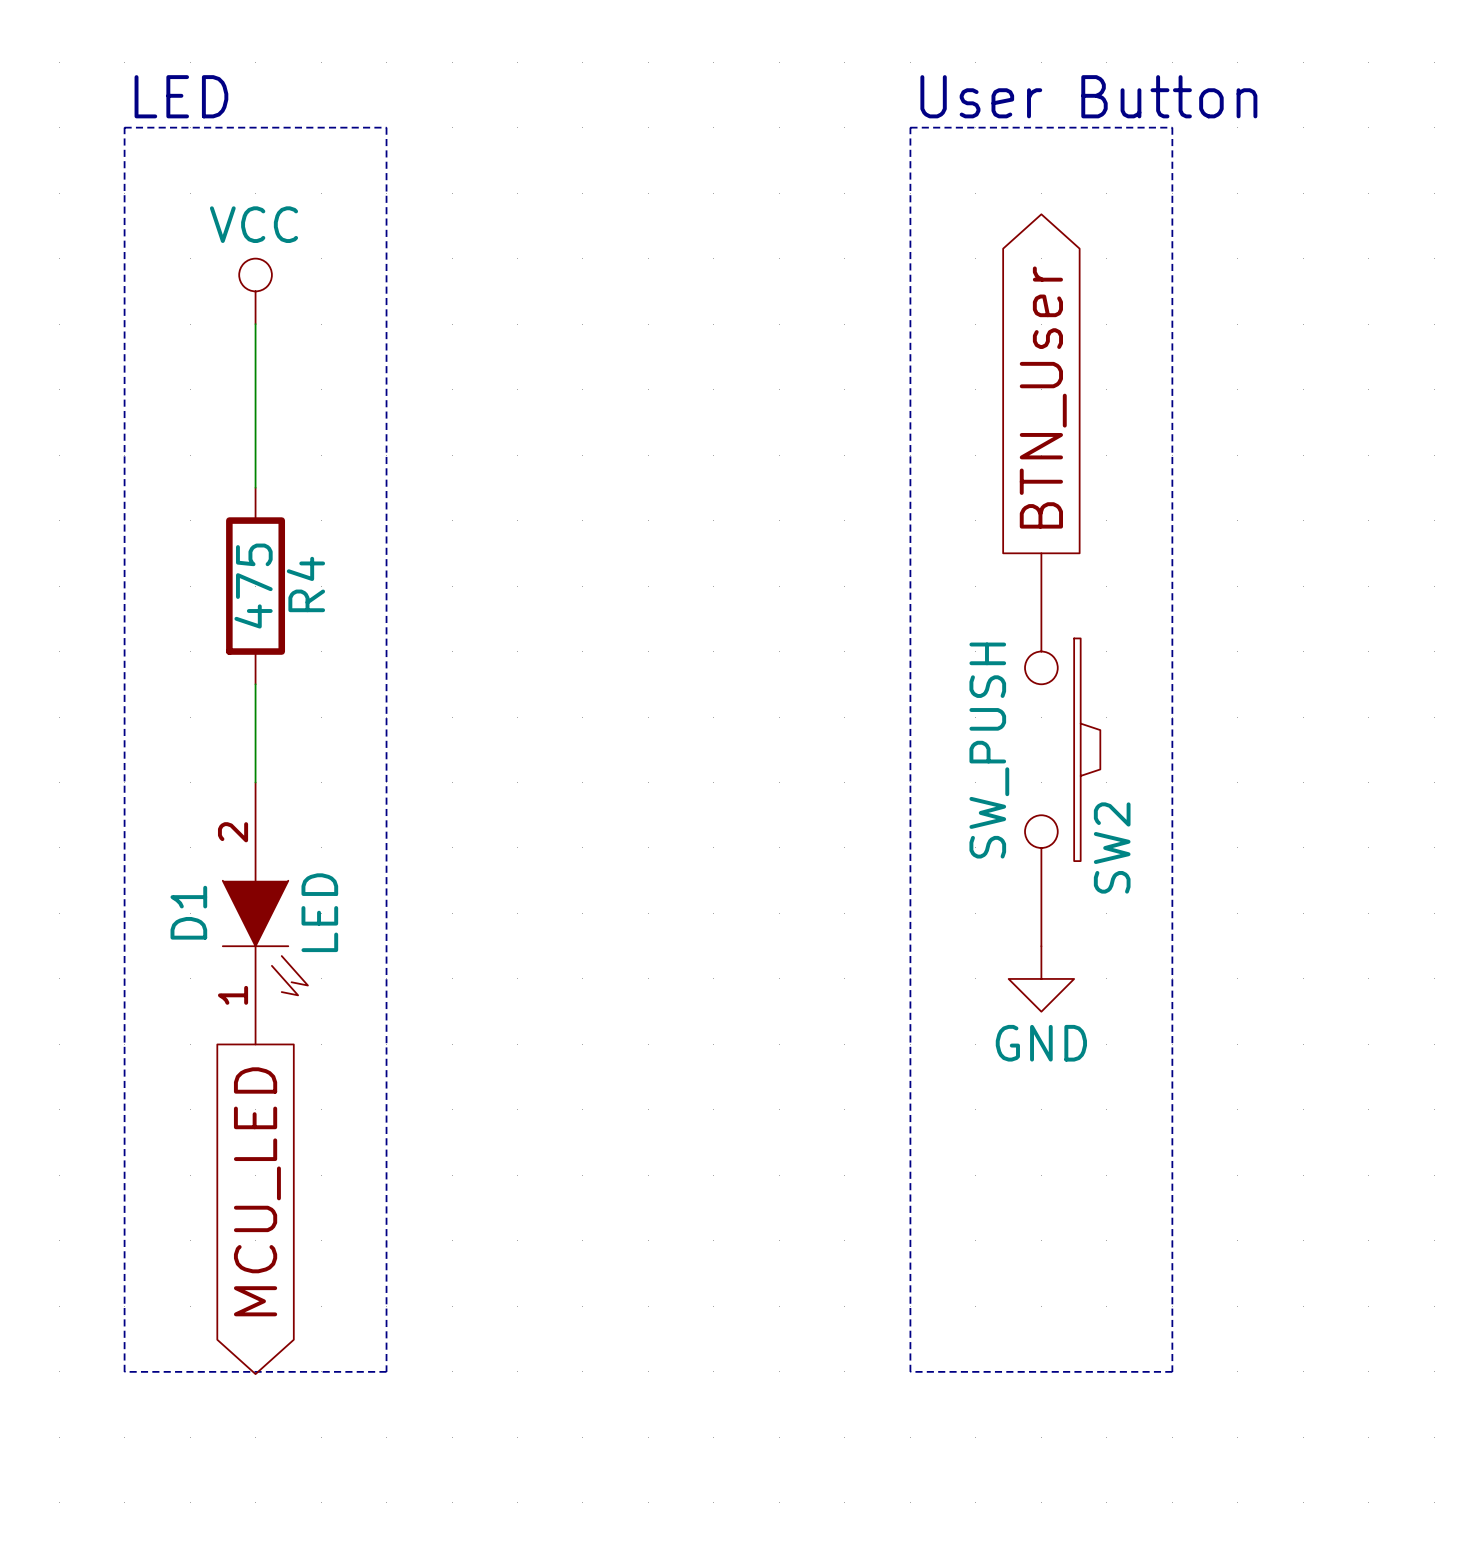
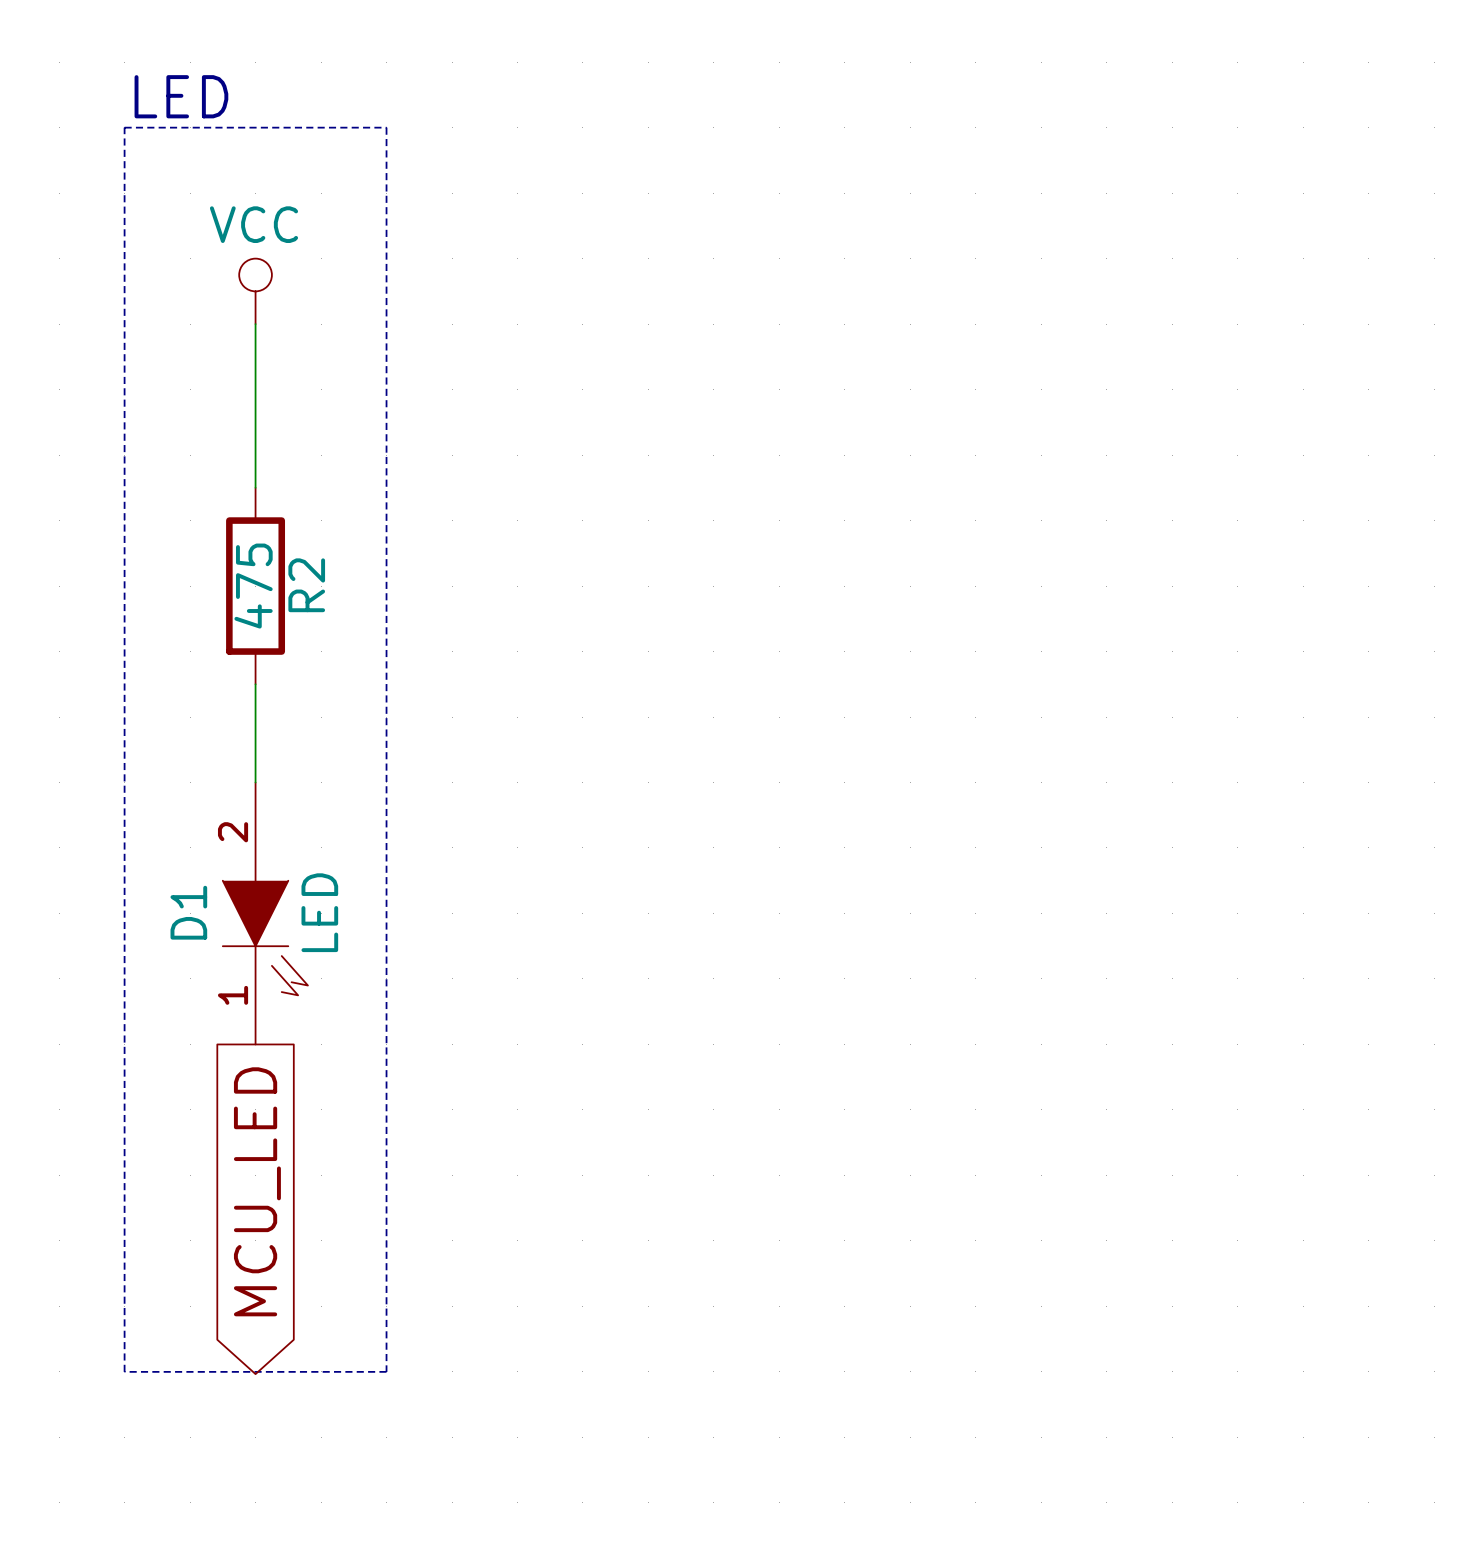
text: User Button (1088, 96) -> none
line: (910, 127) (910, 1371) (1172, 1371) (1172, 127) (910, 127) -> none
global label: BTN_User (1043, 397) -> none
R4 name: R4 (305, 584) -> R2 (306, 585)
SW2: SW_PUSH (1062, 749) -> none
power symbol: GND (1041, 978) -> none

